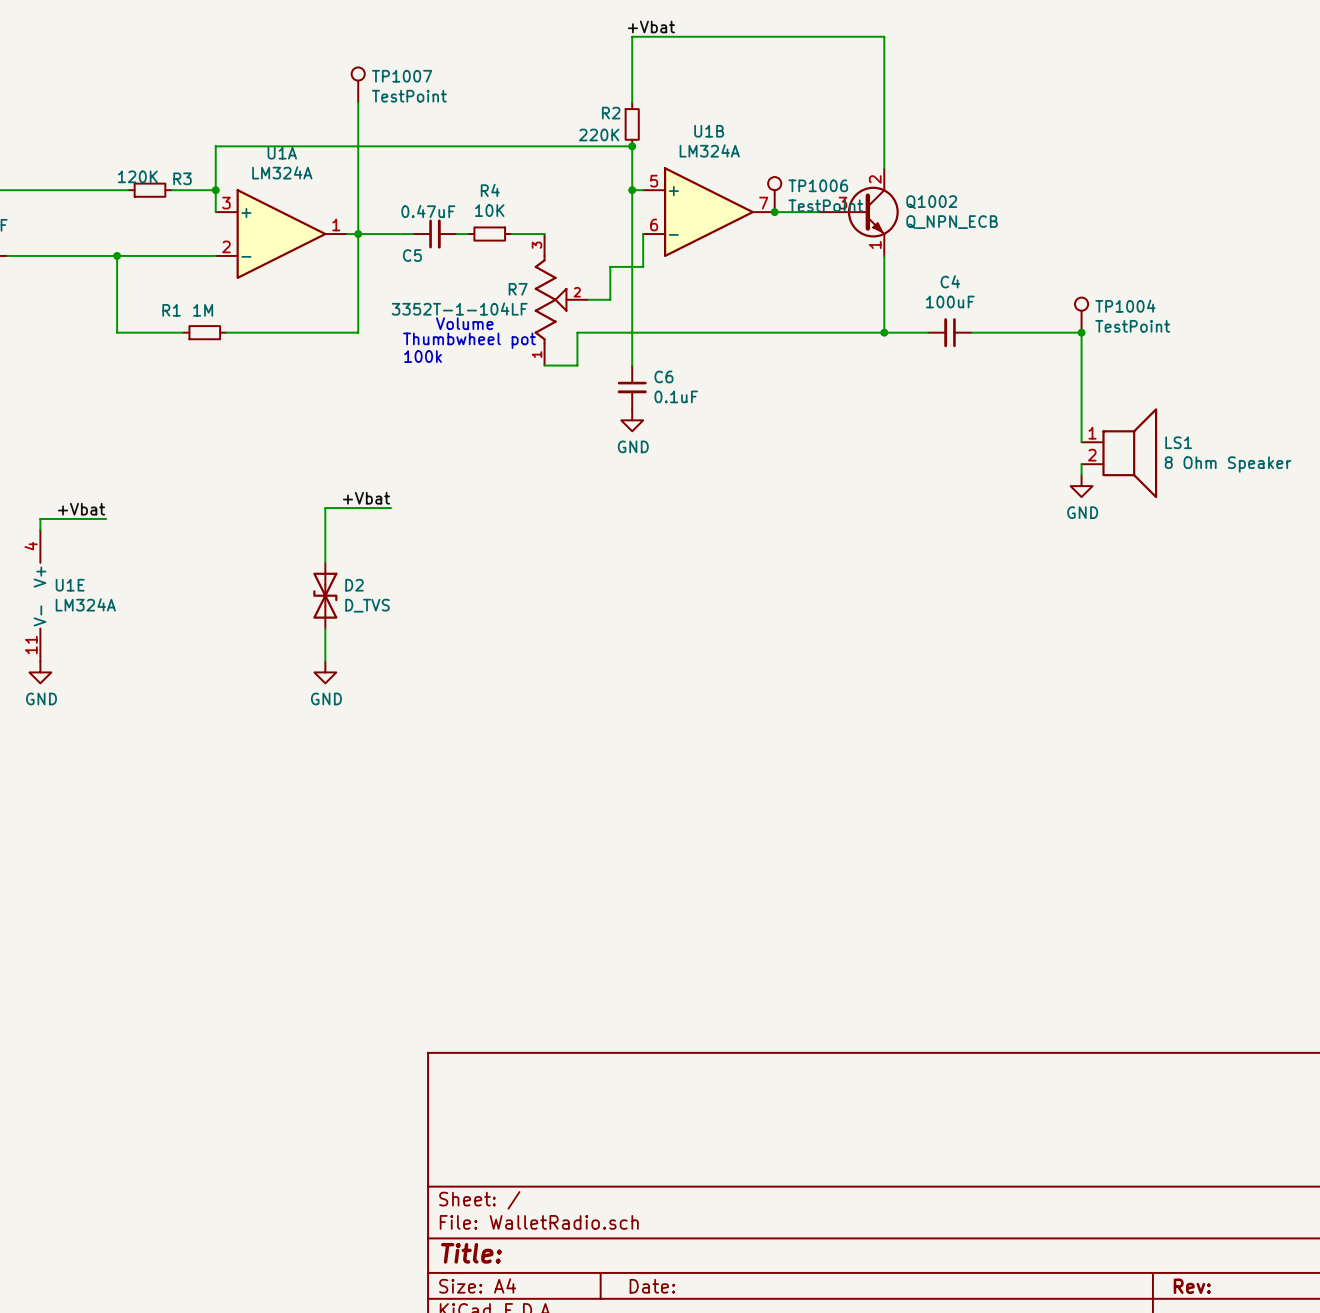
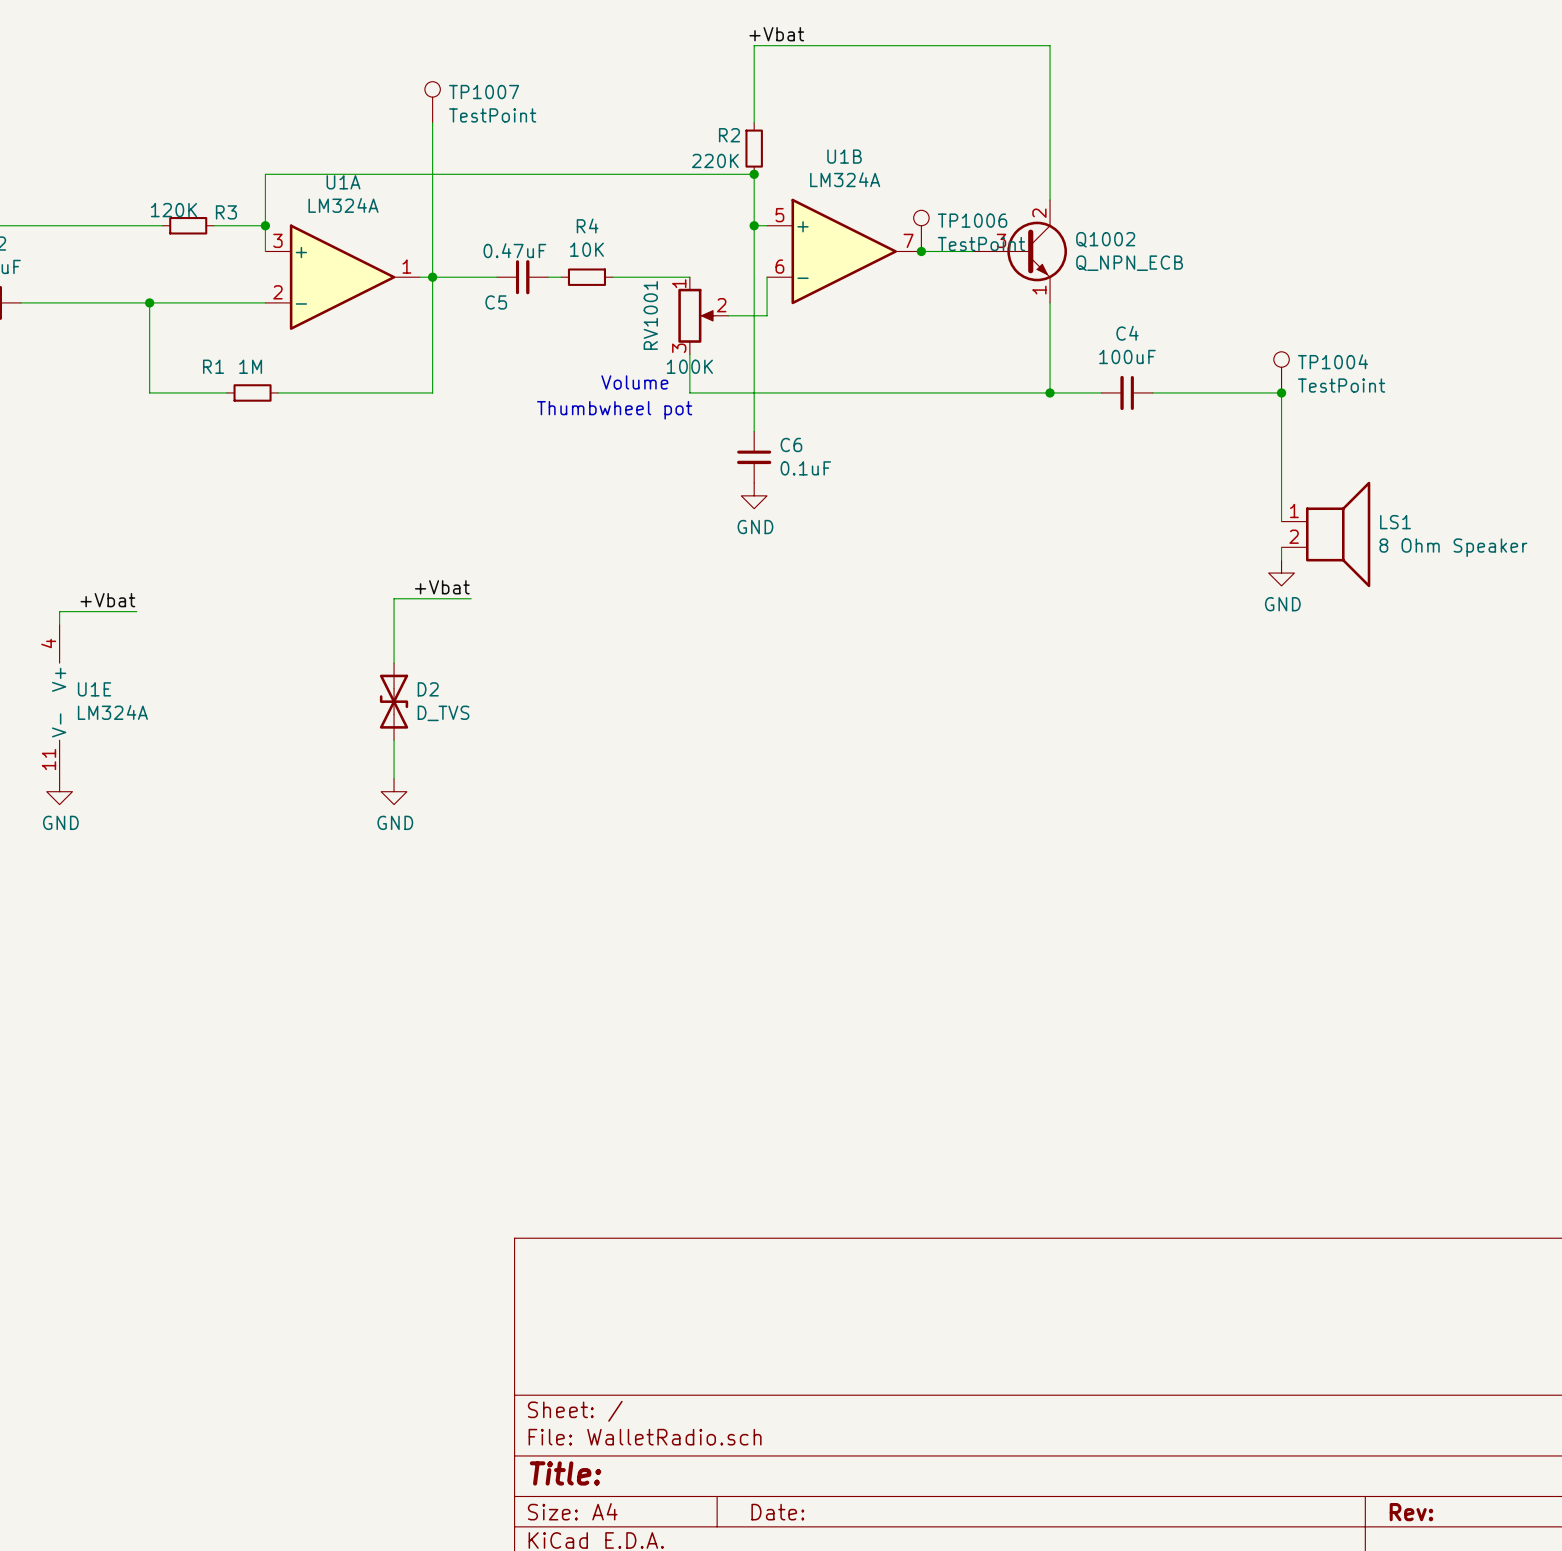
wire: none -> (651, 277) (689, 277)
RV1001: none -> 100K (703, 315)
wire: (610, 266) (610, 299) (588, 299) -> none
R7: 3352T-1-104LF (561, 299) -> none
text position: Volume (464, 323) -> Volume (634, 382)
wire: (577, 332) (577, 365) (544, 365) -> (689, 392) (689, 354)
text position: Thumbwheel pot (469, 340) -> Thumbwheel pot (614, 410)
text: 100k (423, 356) -> none

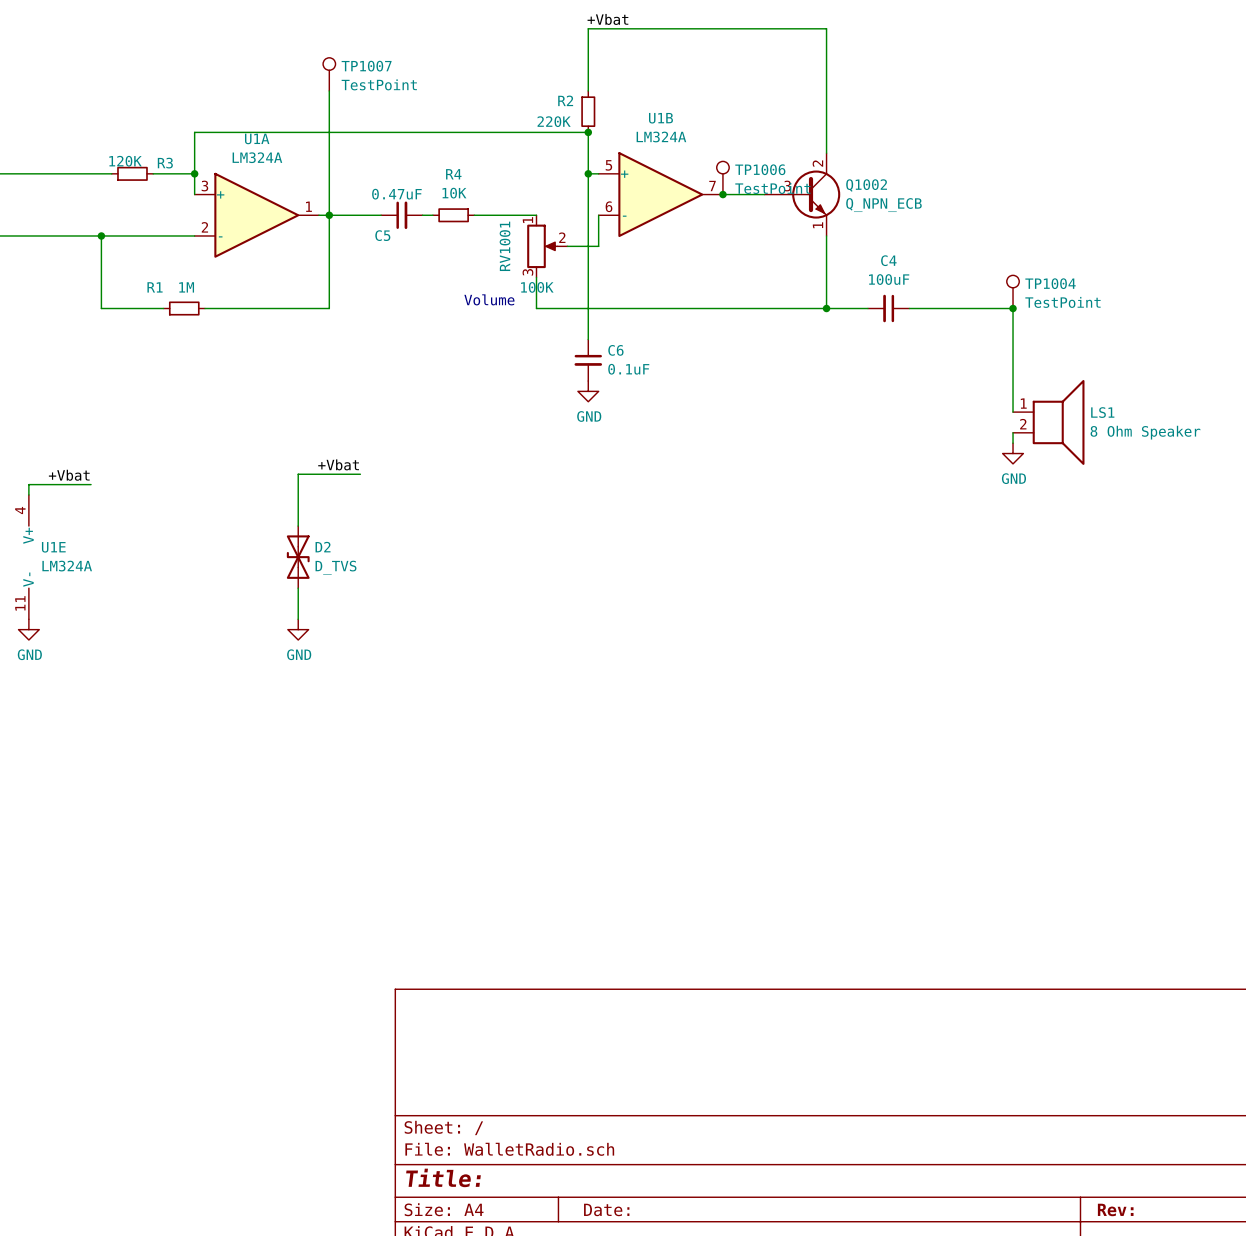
text: Thumbwheel pot (614, 410) -> none

